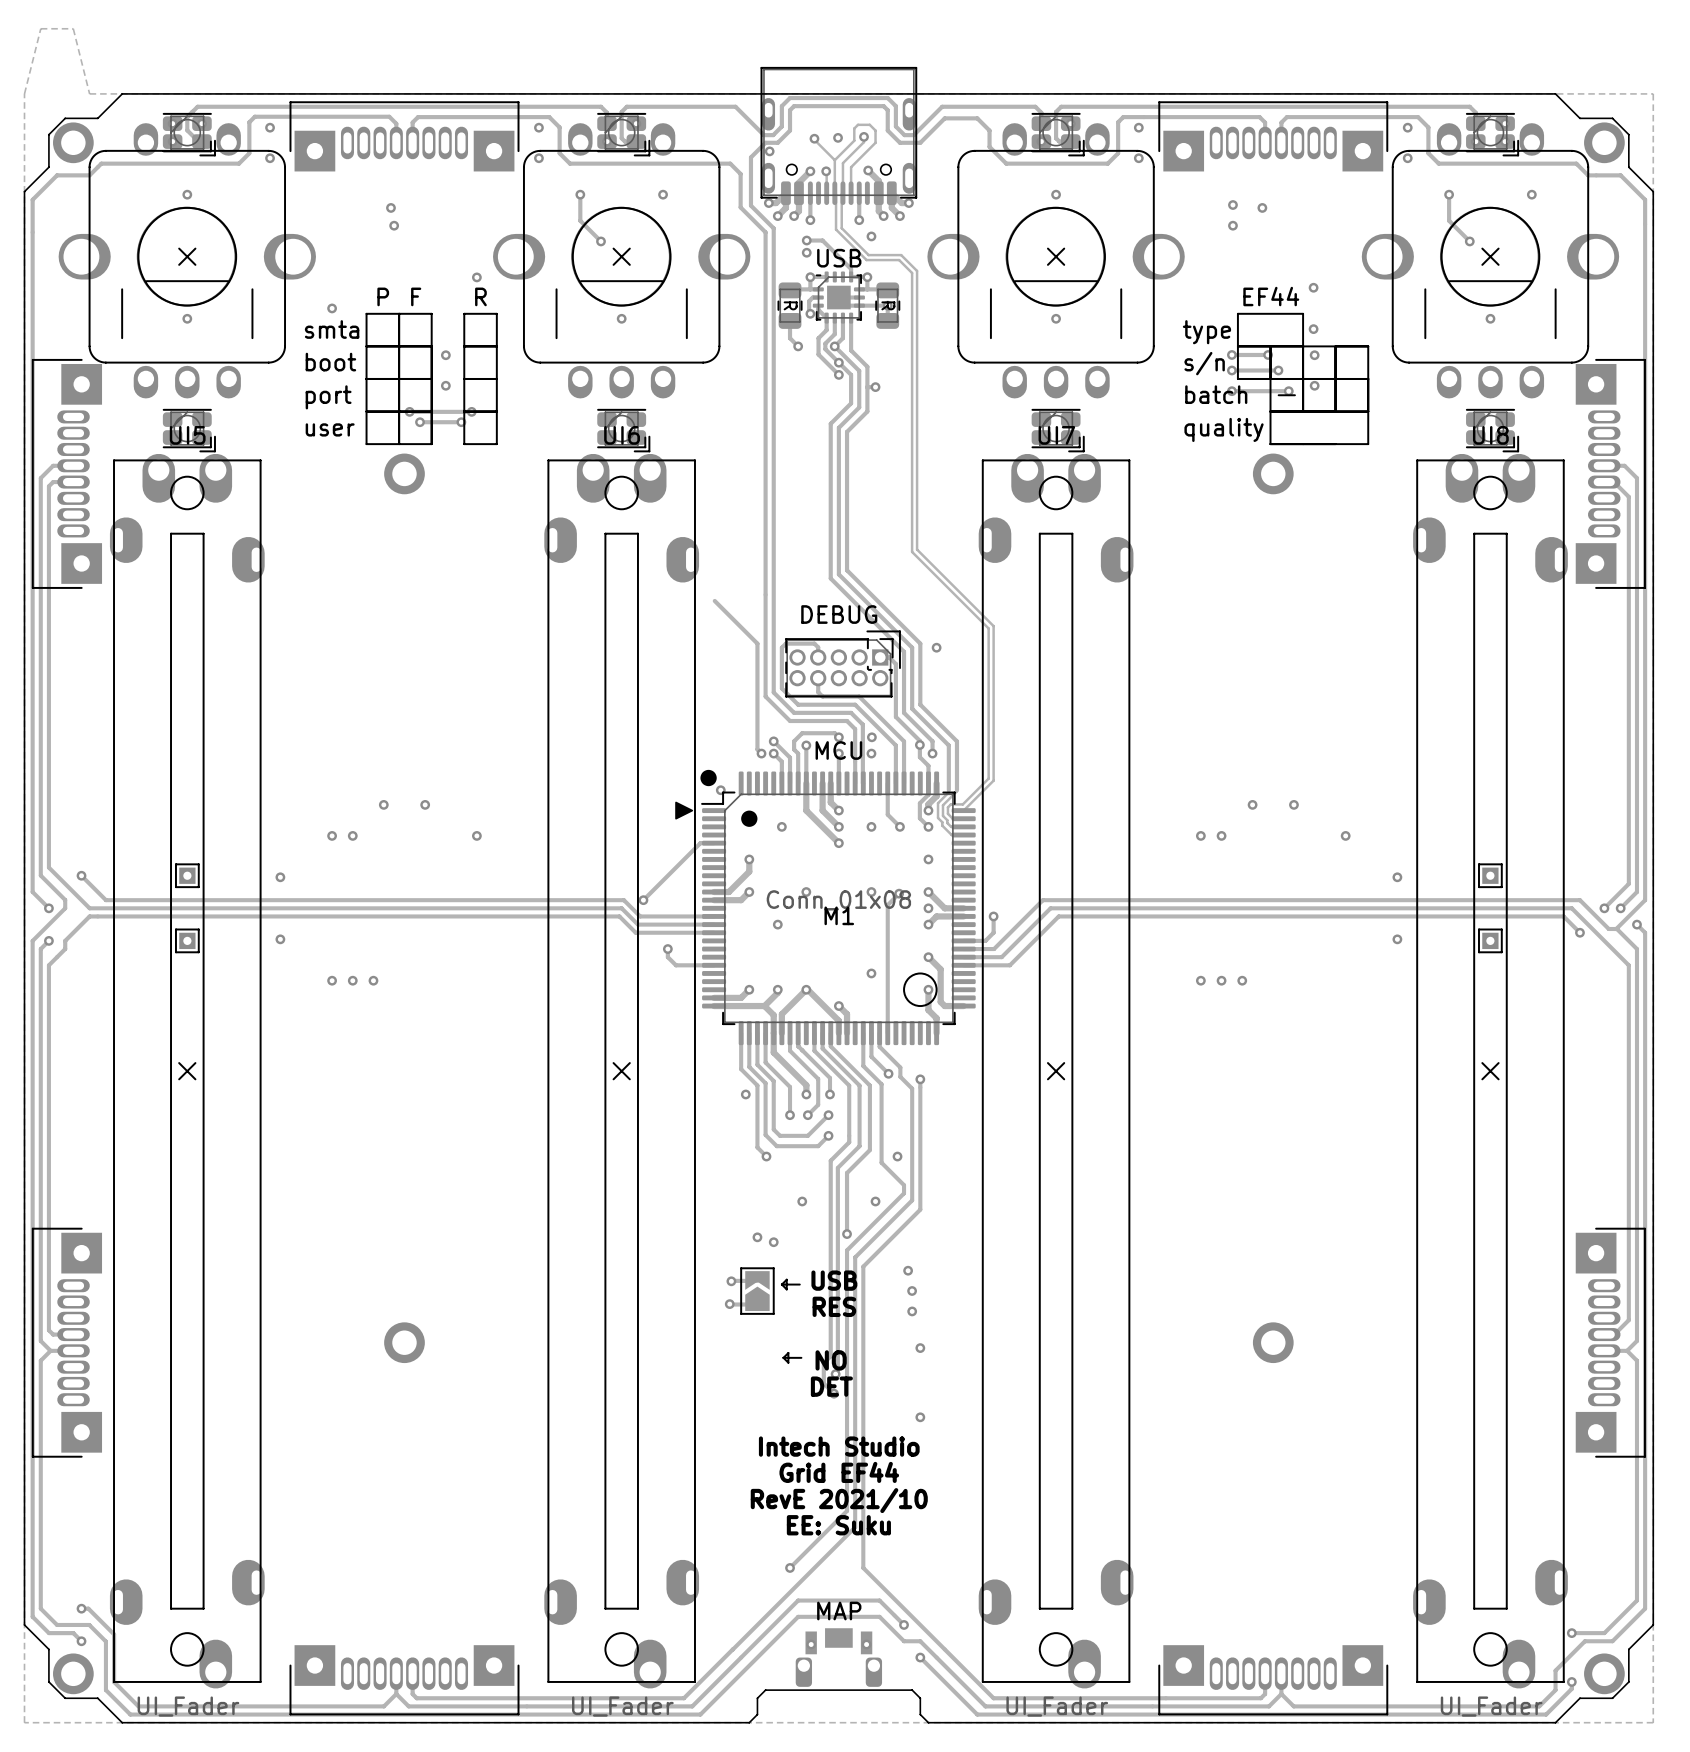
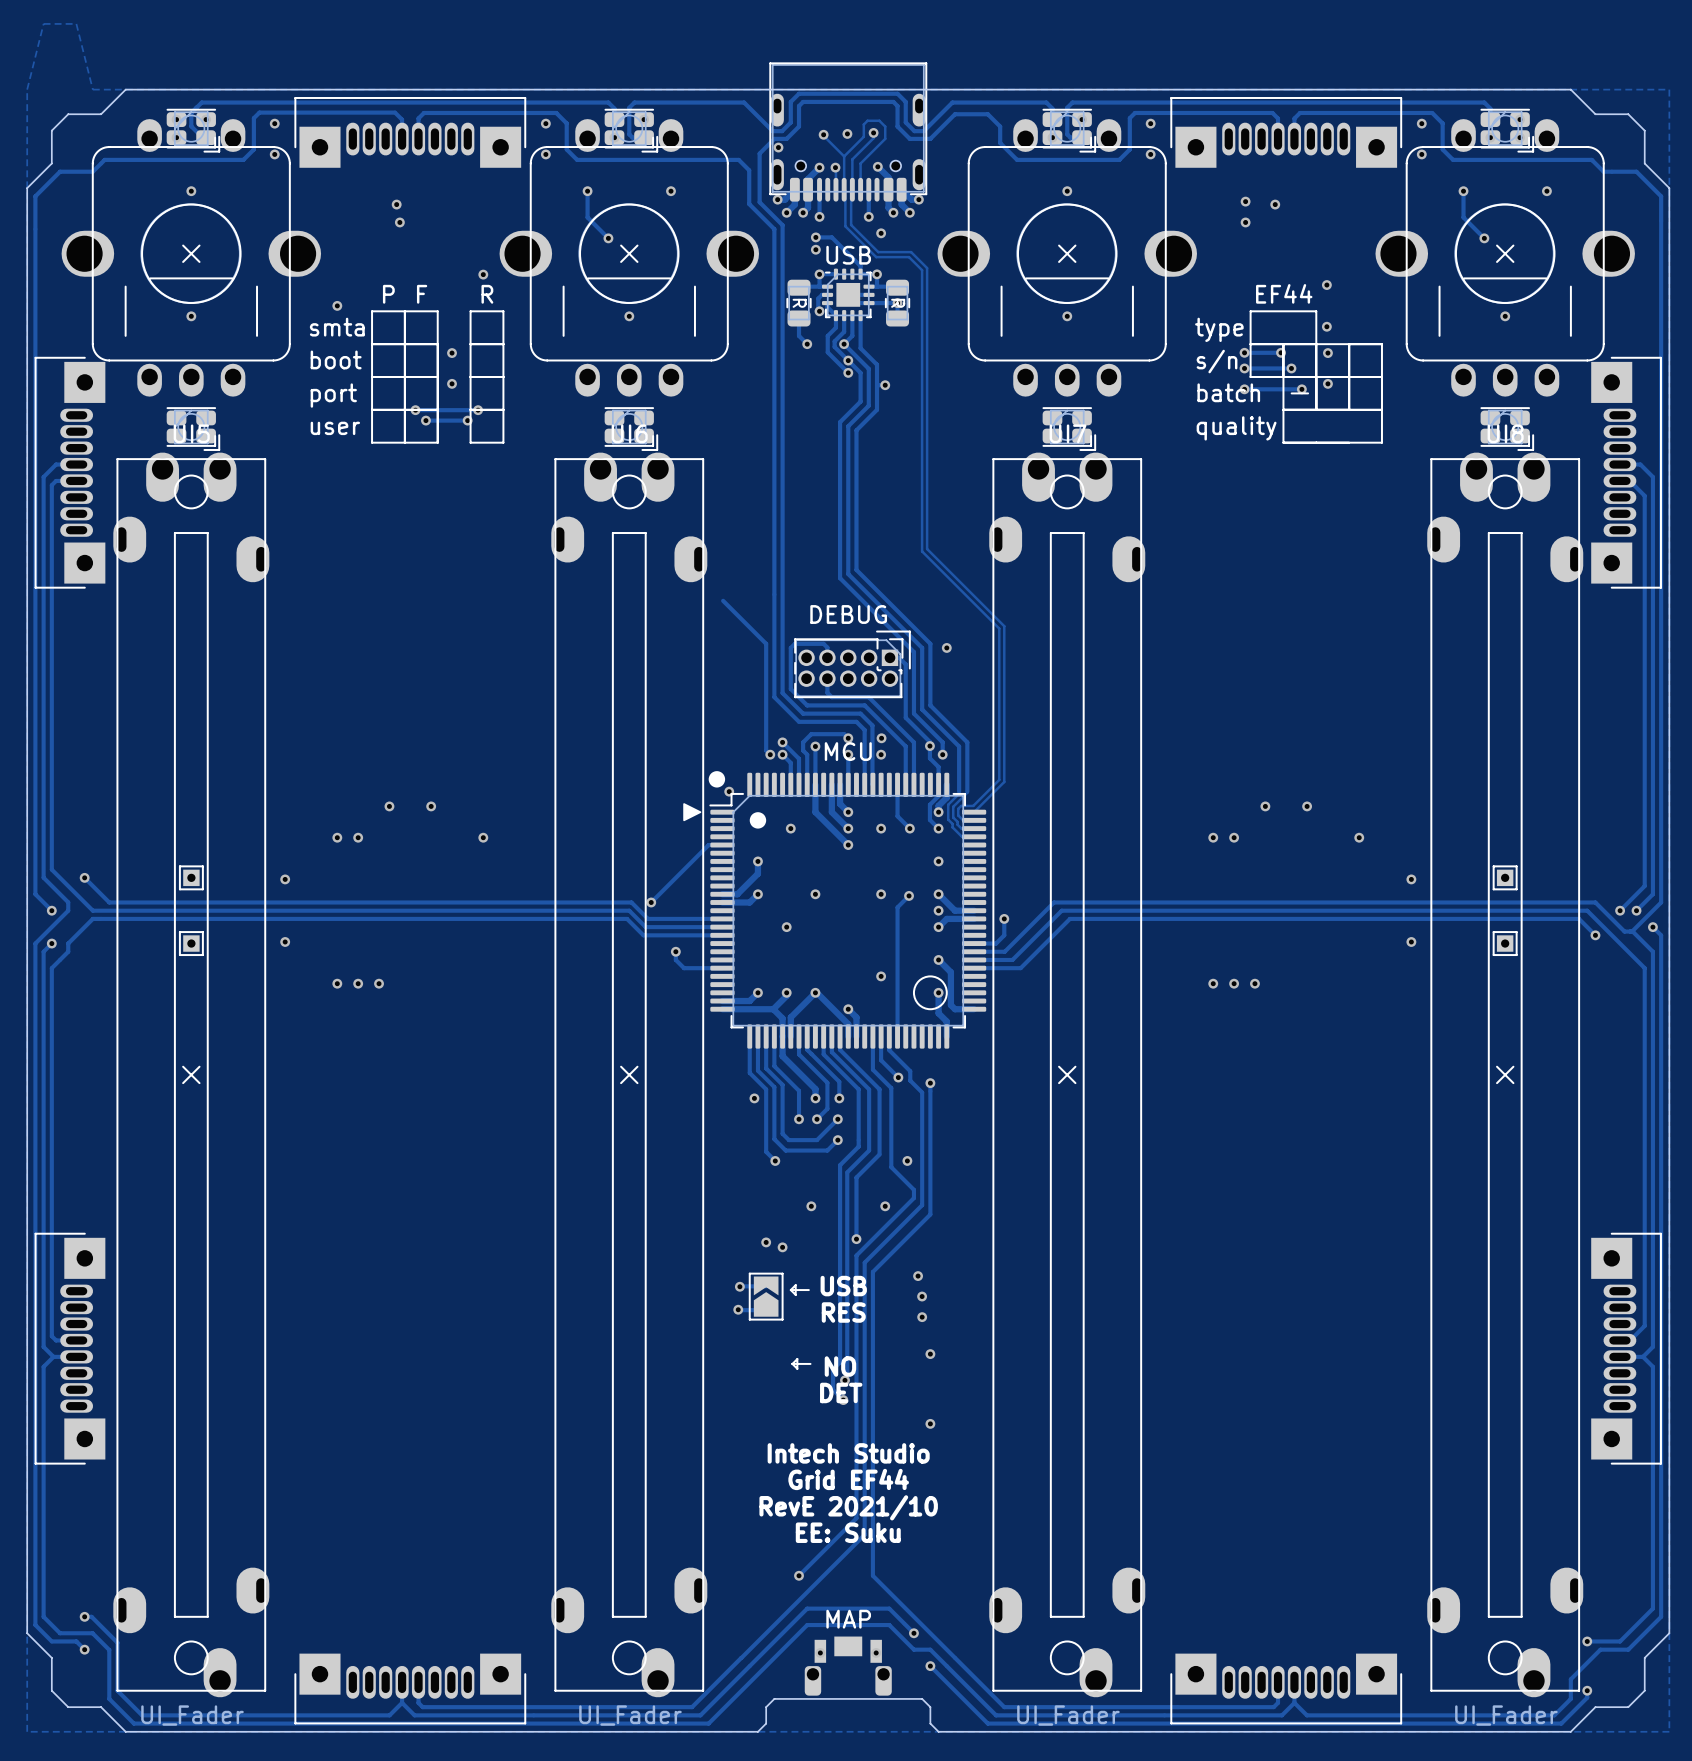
M1: Conn_01x08 (838, 908) -> none

